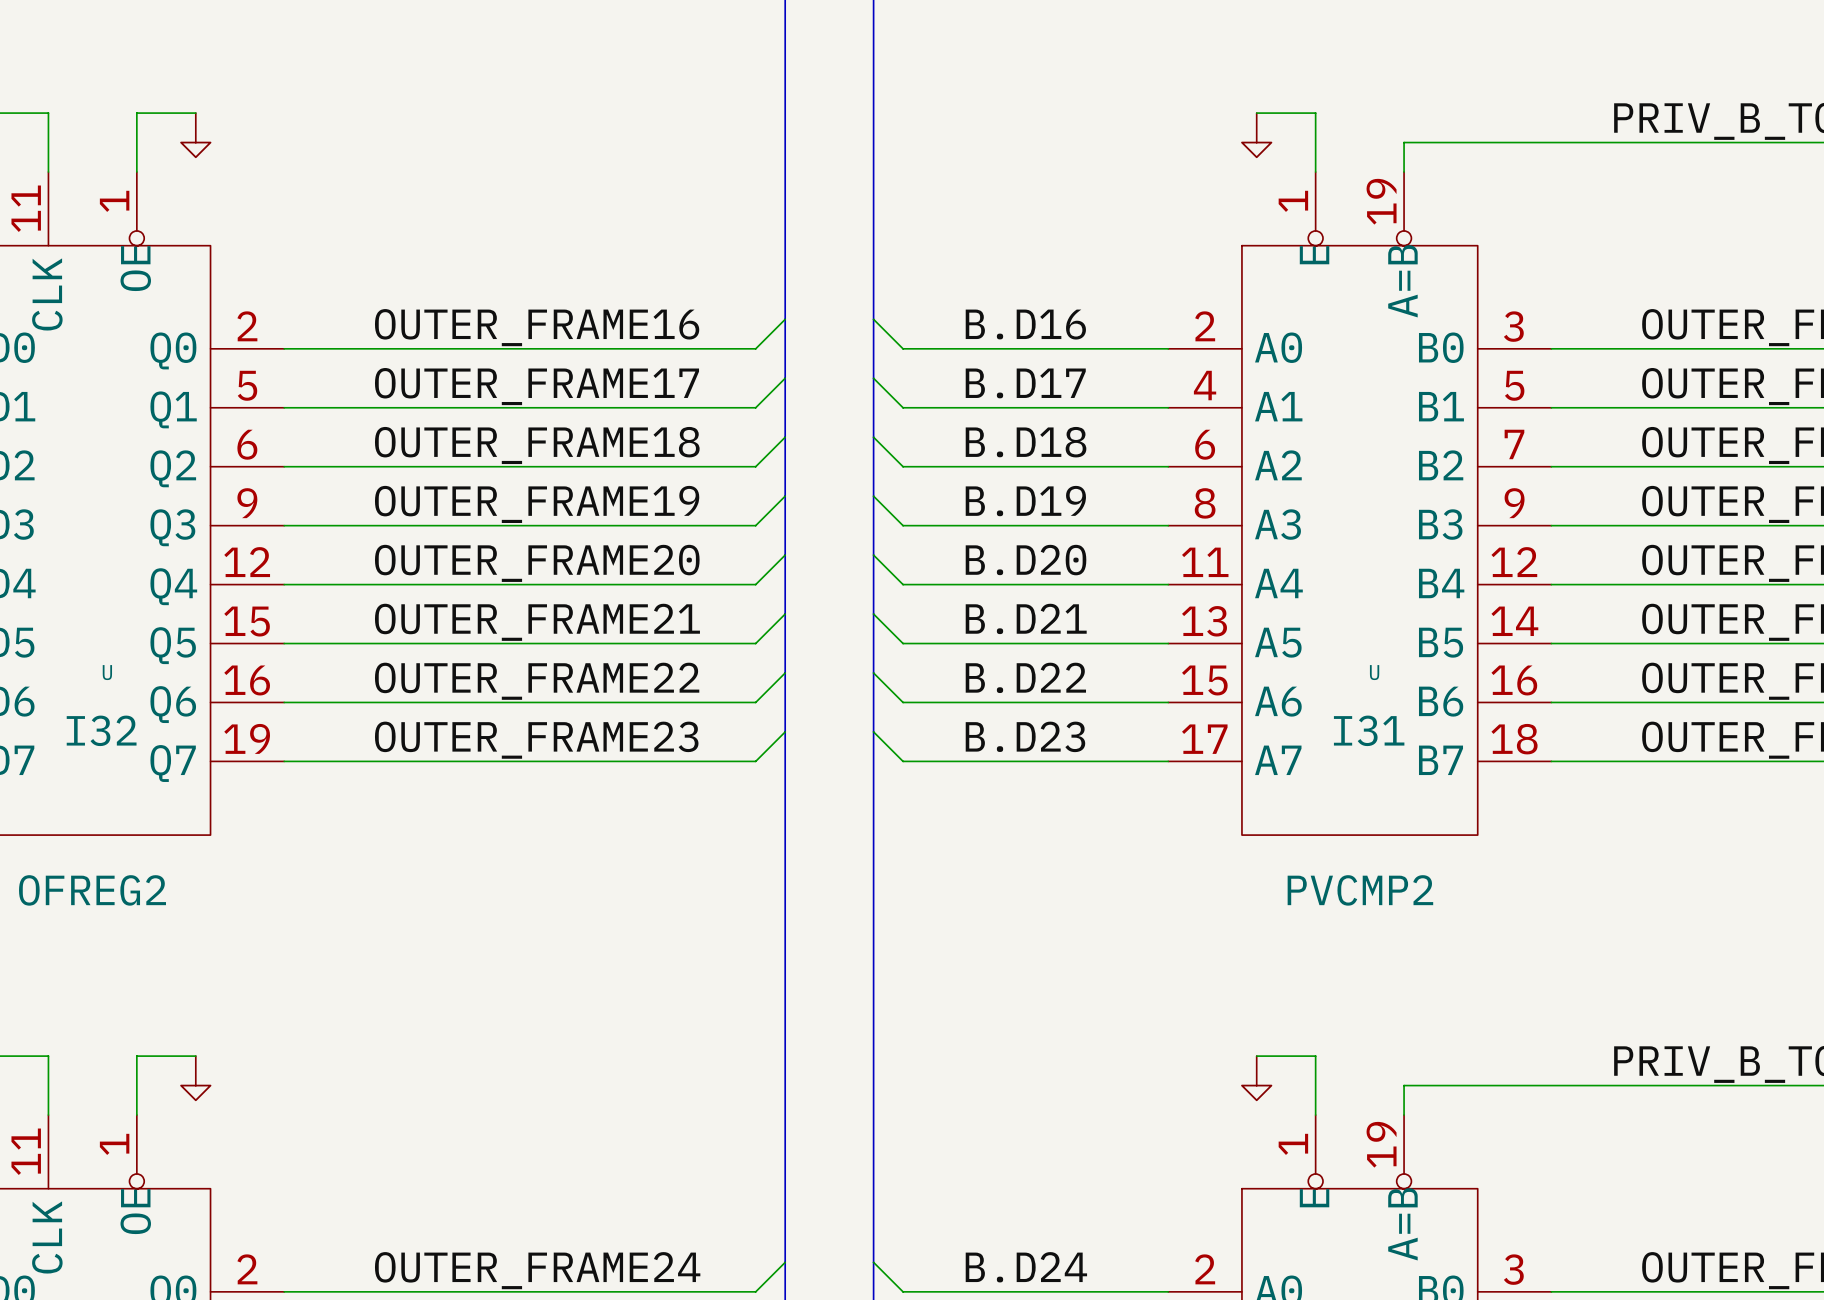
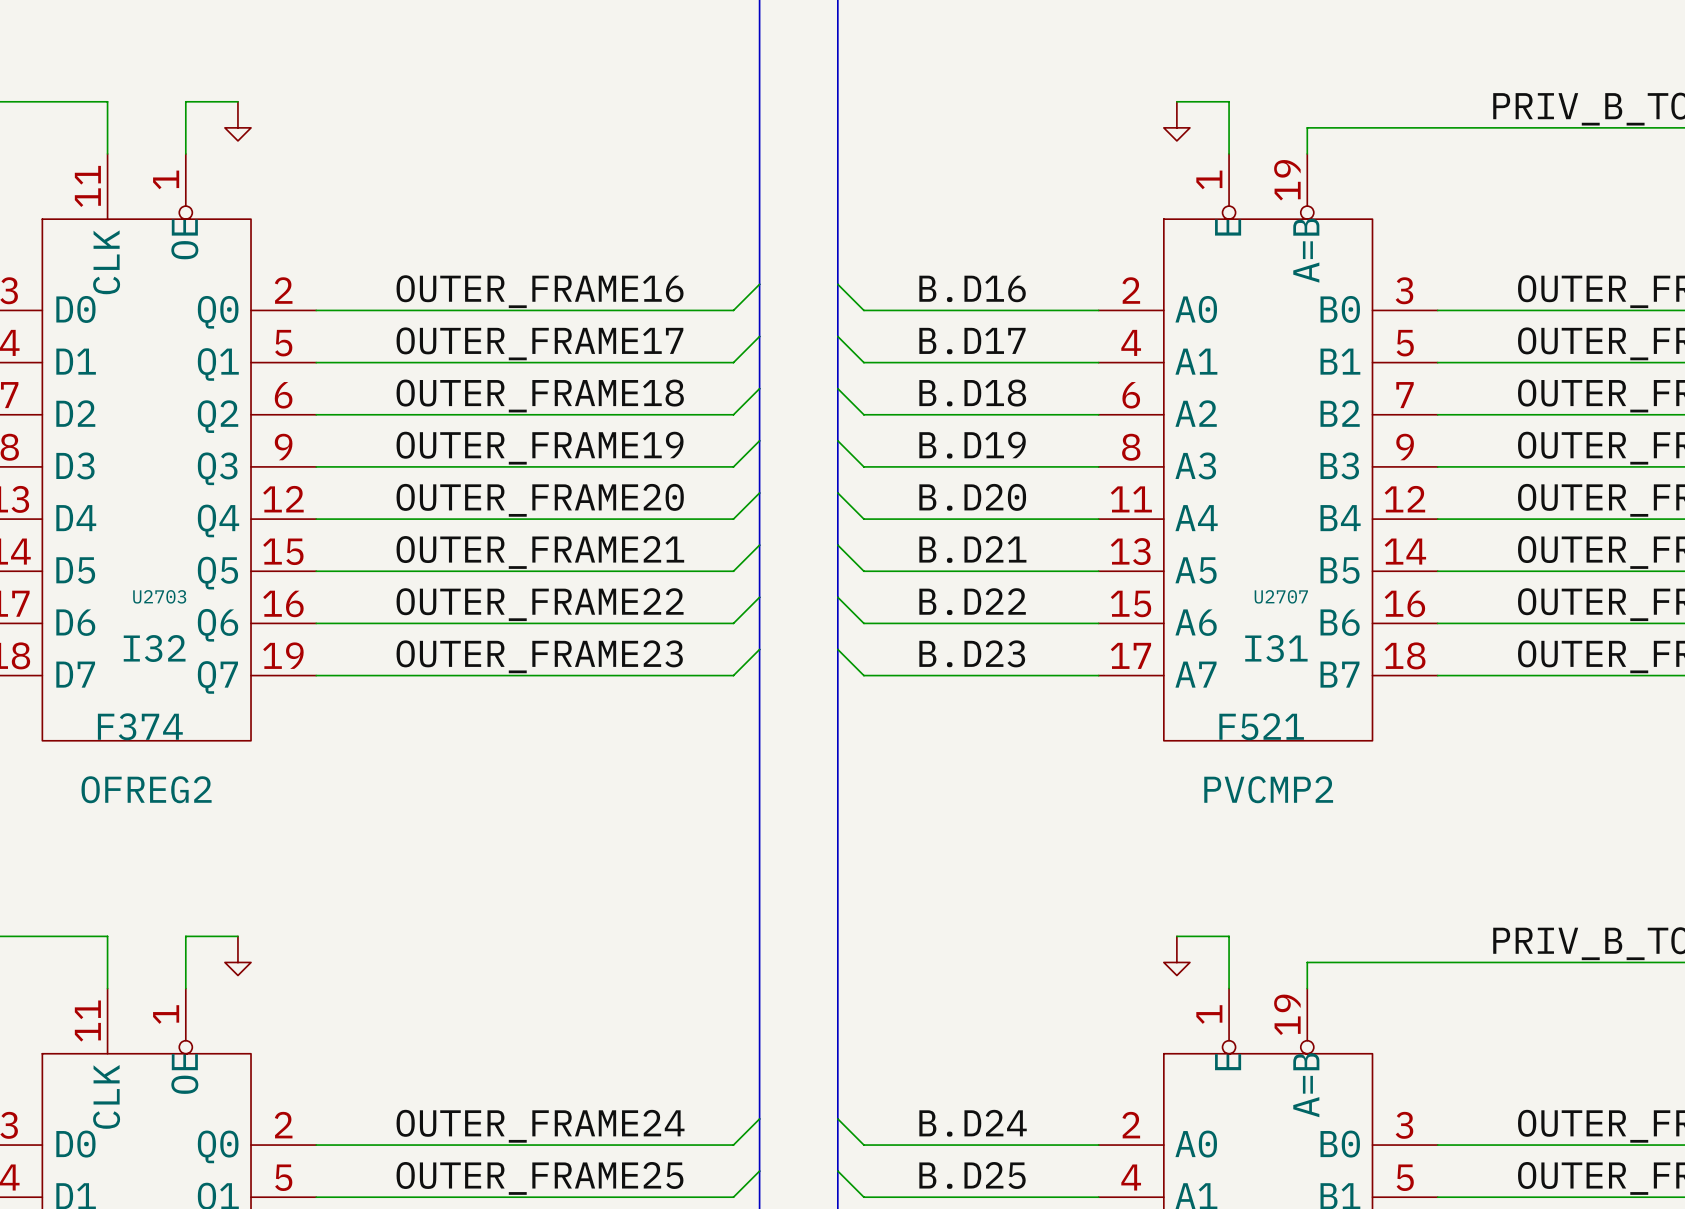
U name: U (107, 672) -> U2703 (159, 596)
U name: U (1374, 672) -> U2707 (1281, 596)
U value: none -> F374 (140, 726)
U value: none -> F521 (1261, 726)

